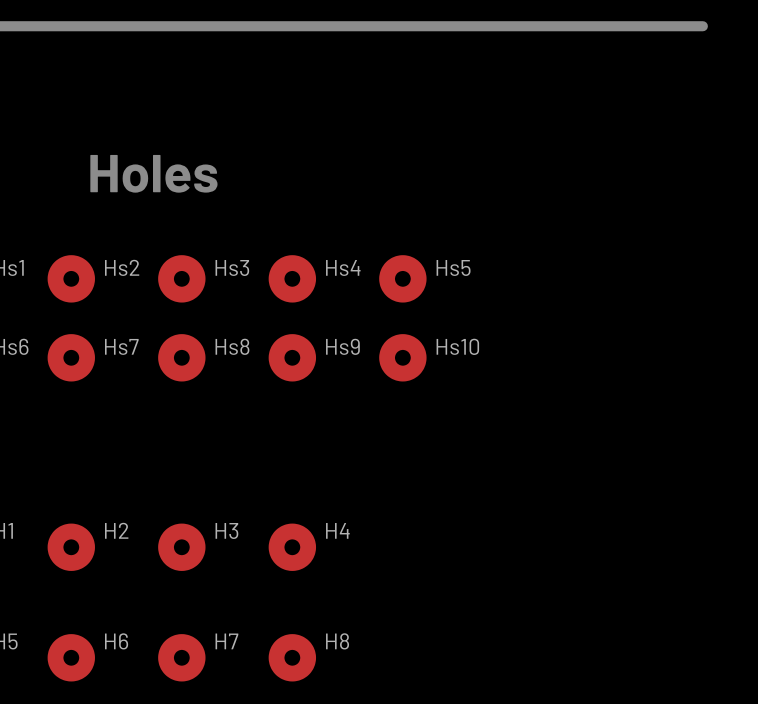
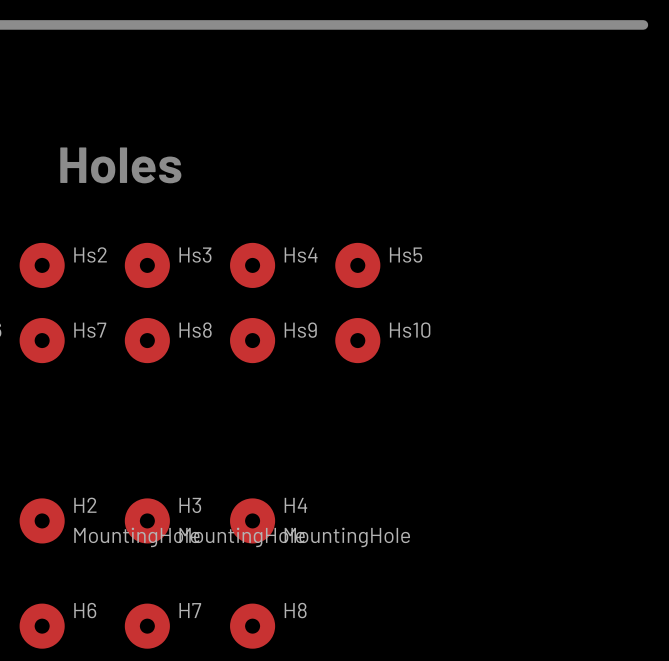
H2 value: none -> MountingHole (136, 537)
H3 value: none -> MountingHole (242, 537)
H4 value: none -> MountingHole (347, 537)

